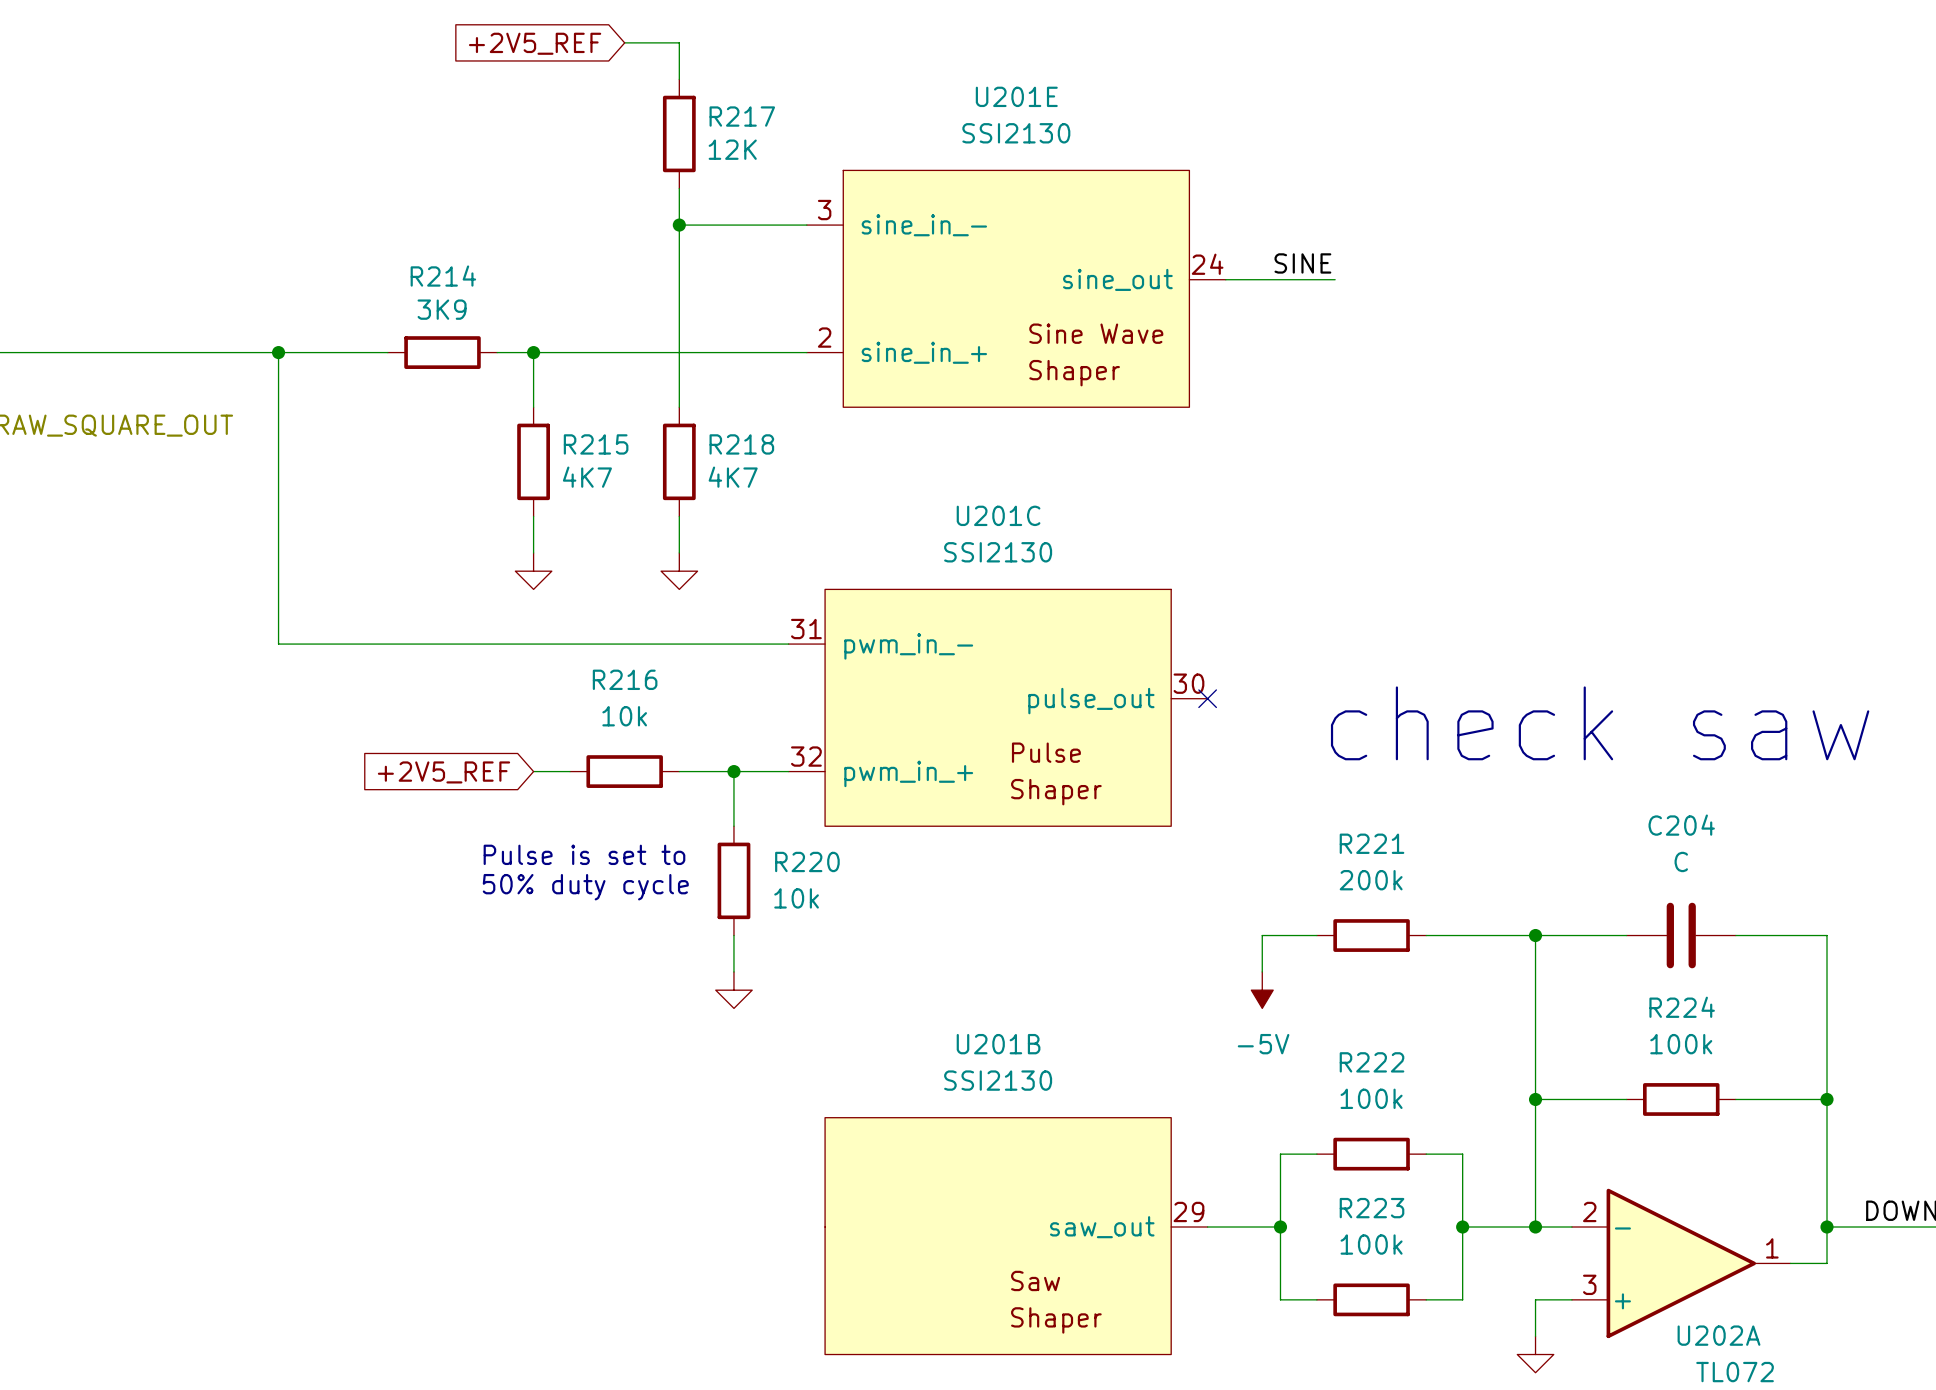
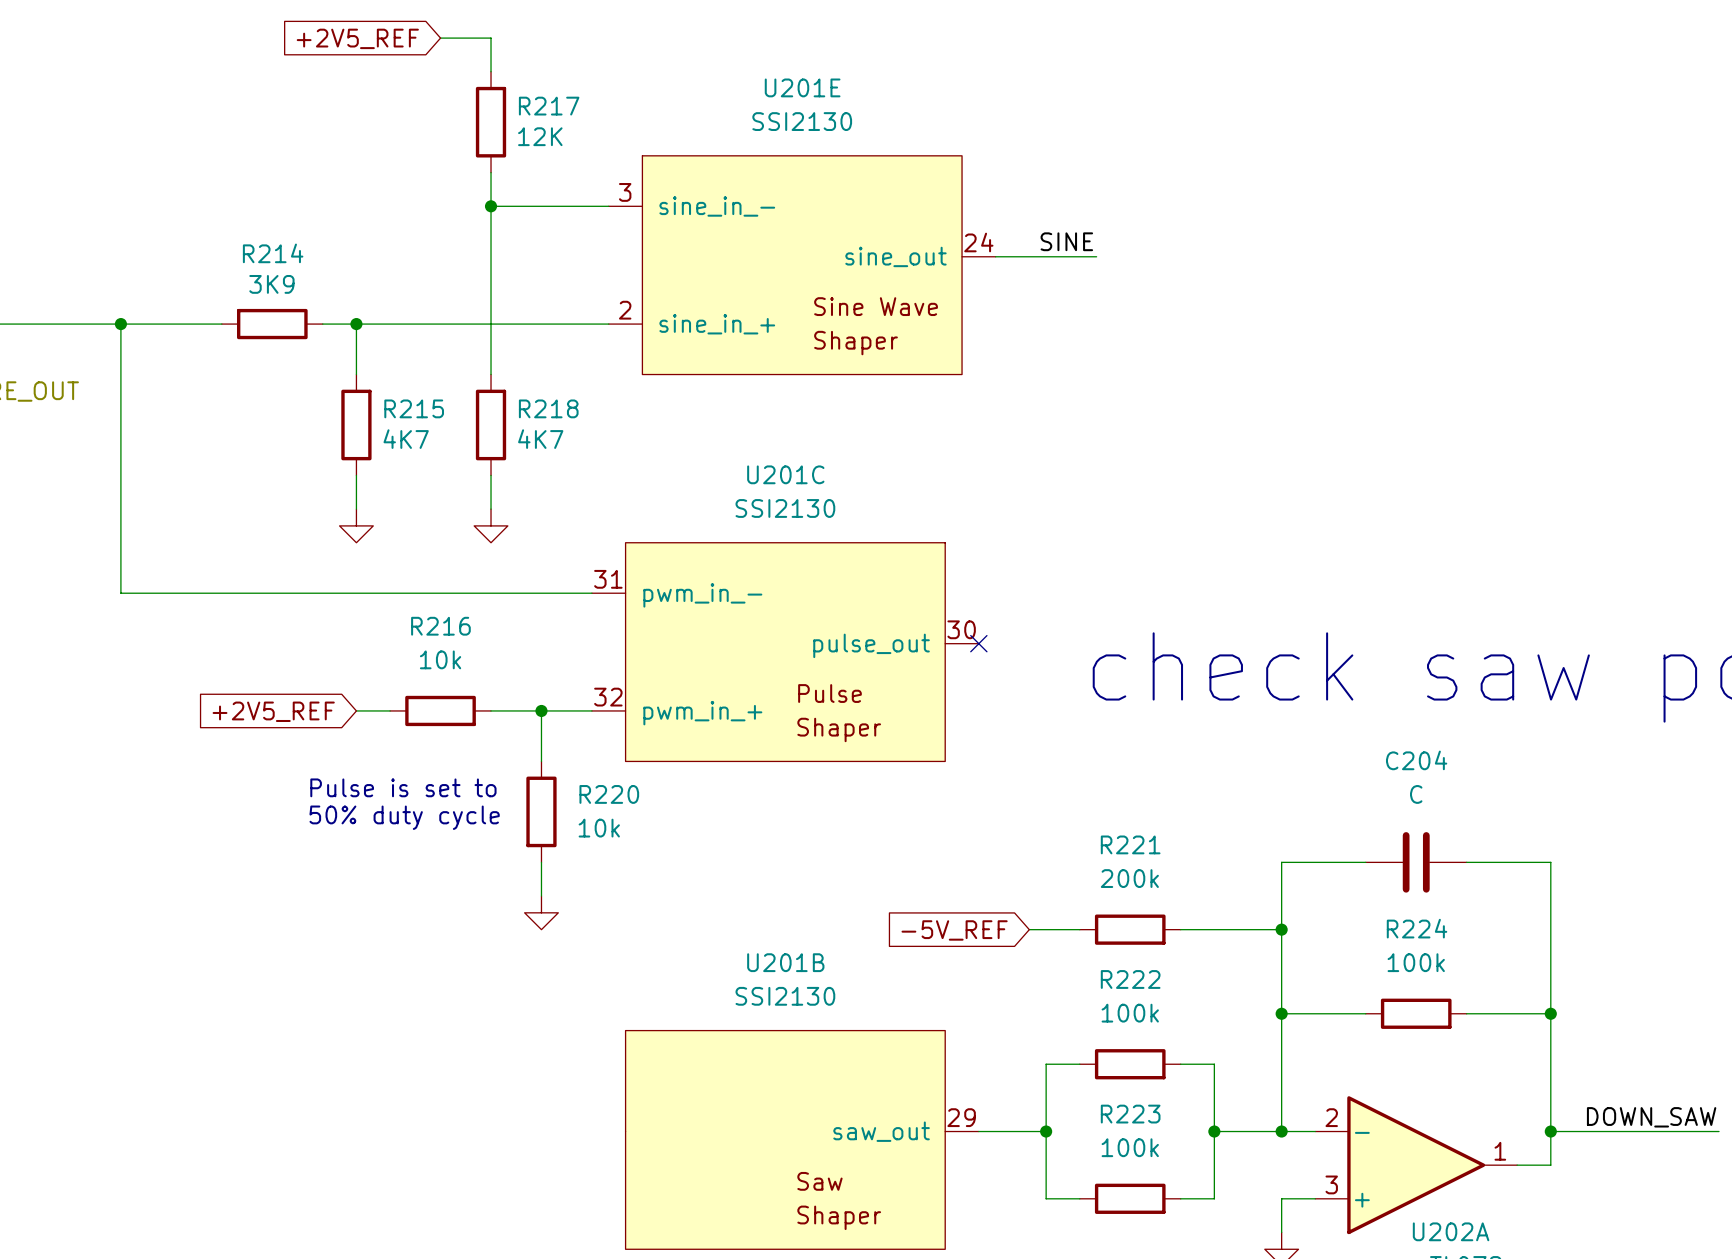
wire: (1316, 935) (1262, 935) (1262, 971) -> none
R221 position: (1371, 935) -> (1130, 929)
wire: (1426, 935) (1535, 935) -> (1180, 929) (1281, 929)
junction position: (1535, 935) -> (1281, 929)
power symbol: -5V (1262, 990) -> none
wire: none -> (1029, 929) (1079, 929)
global label: none -> -5V_REF (954, 930)

